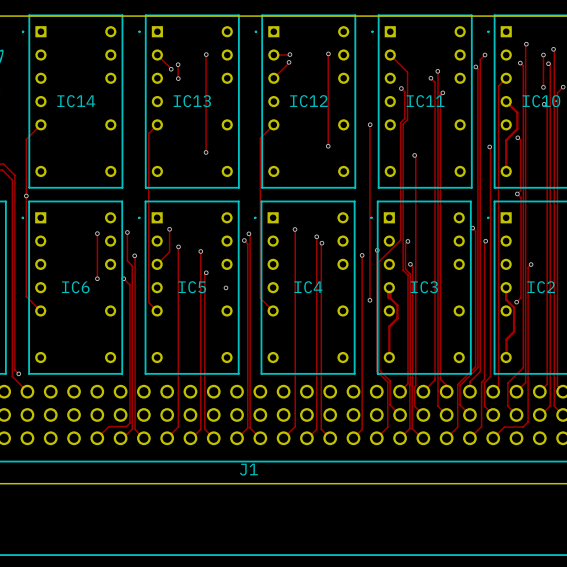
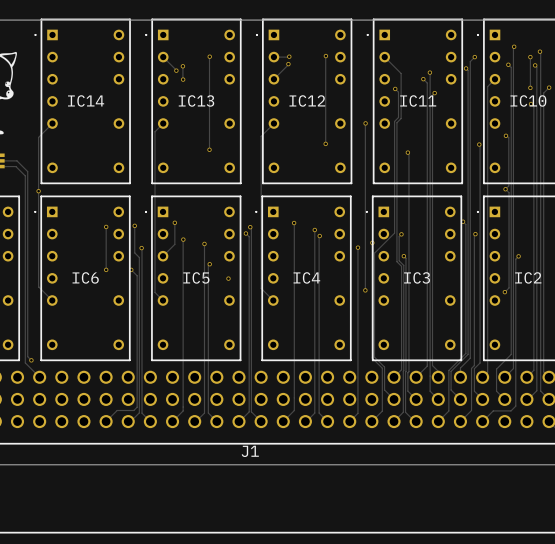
track: (506, 101) (517, 112) (517, 129) (506, 140) (506, 171) -> none
track: (389, 287) (389, 297) (397, 305) (397, 318) (389, 326) (389, 357) -> none
track: (506, 287) (506, 299) (514, 307) (514, 331) (506, 339) (506, 357) -> none

